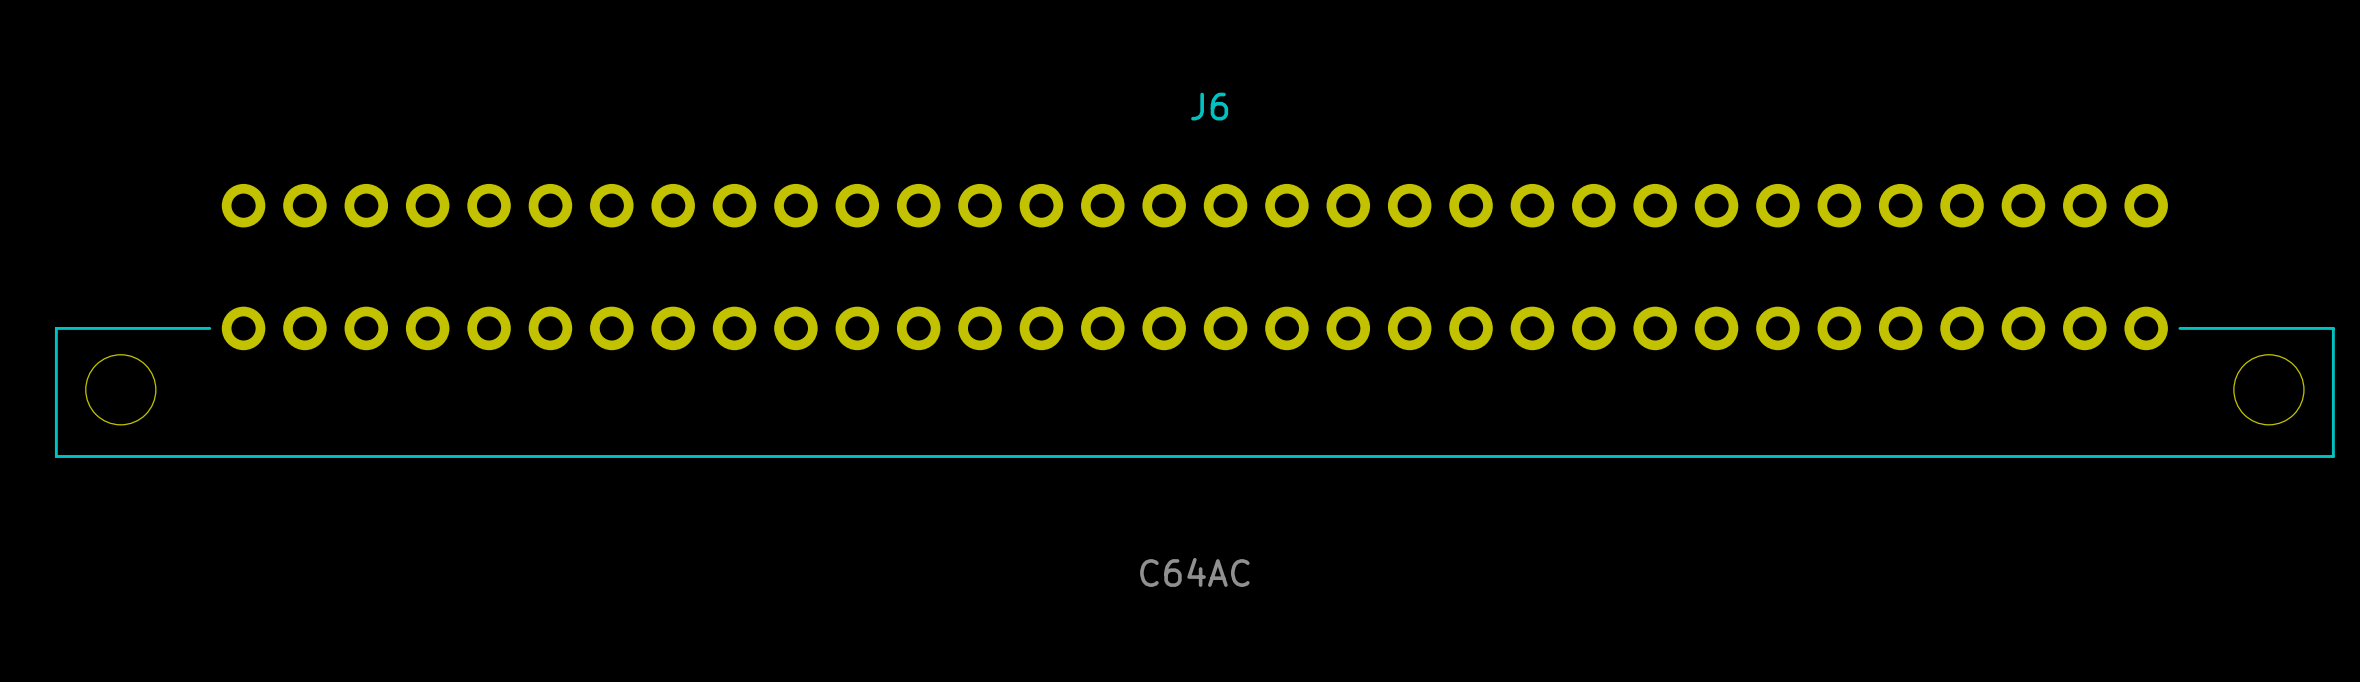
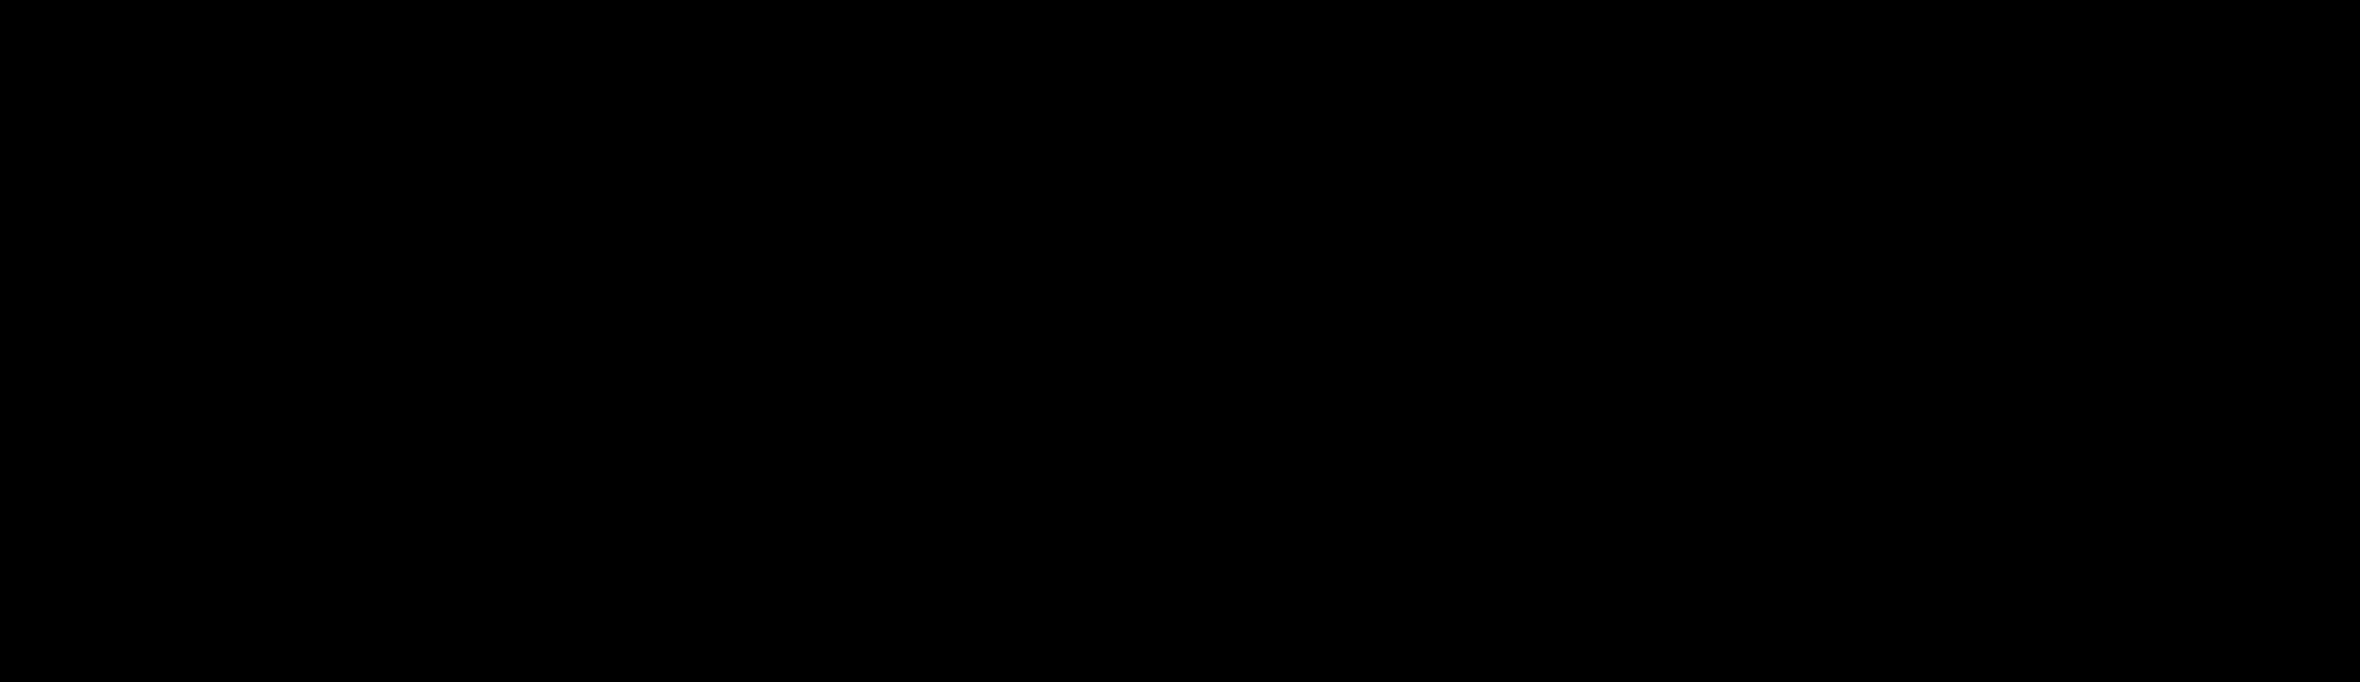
J6: C64AC (1194, 320) -> none

